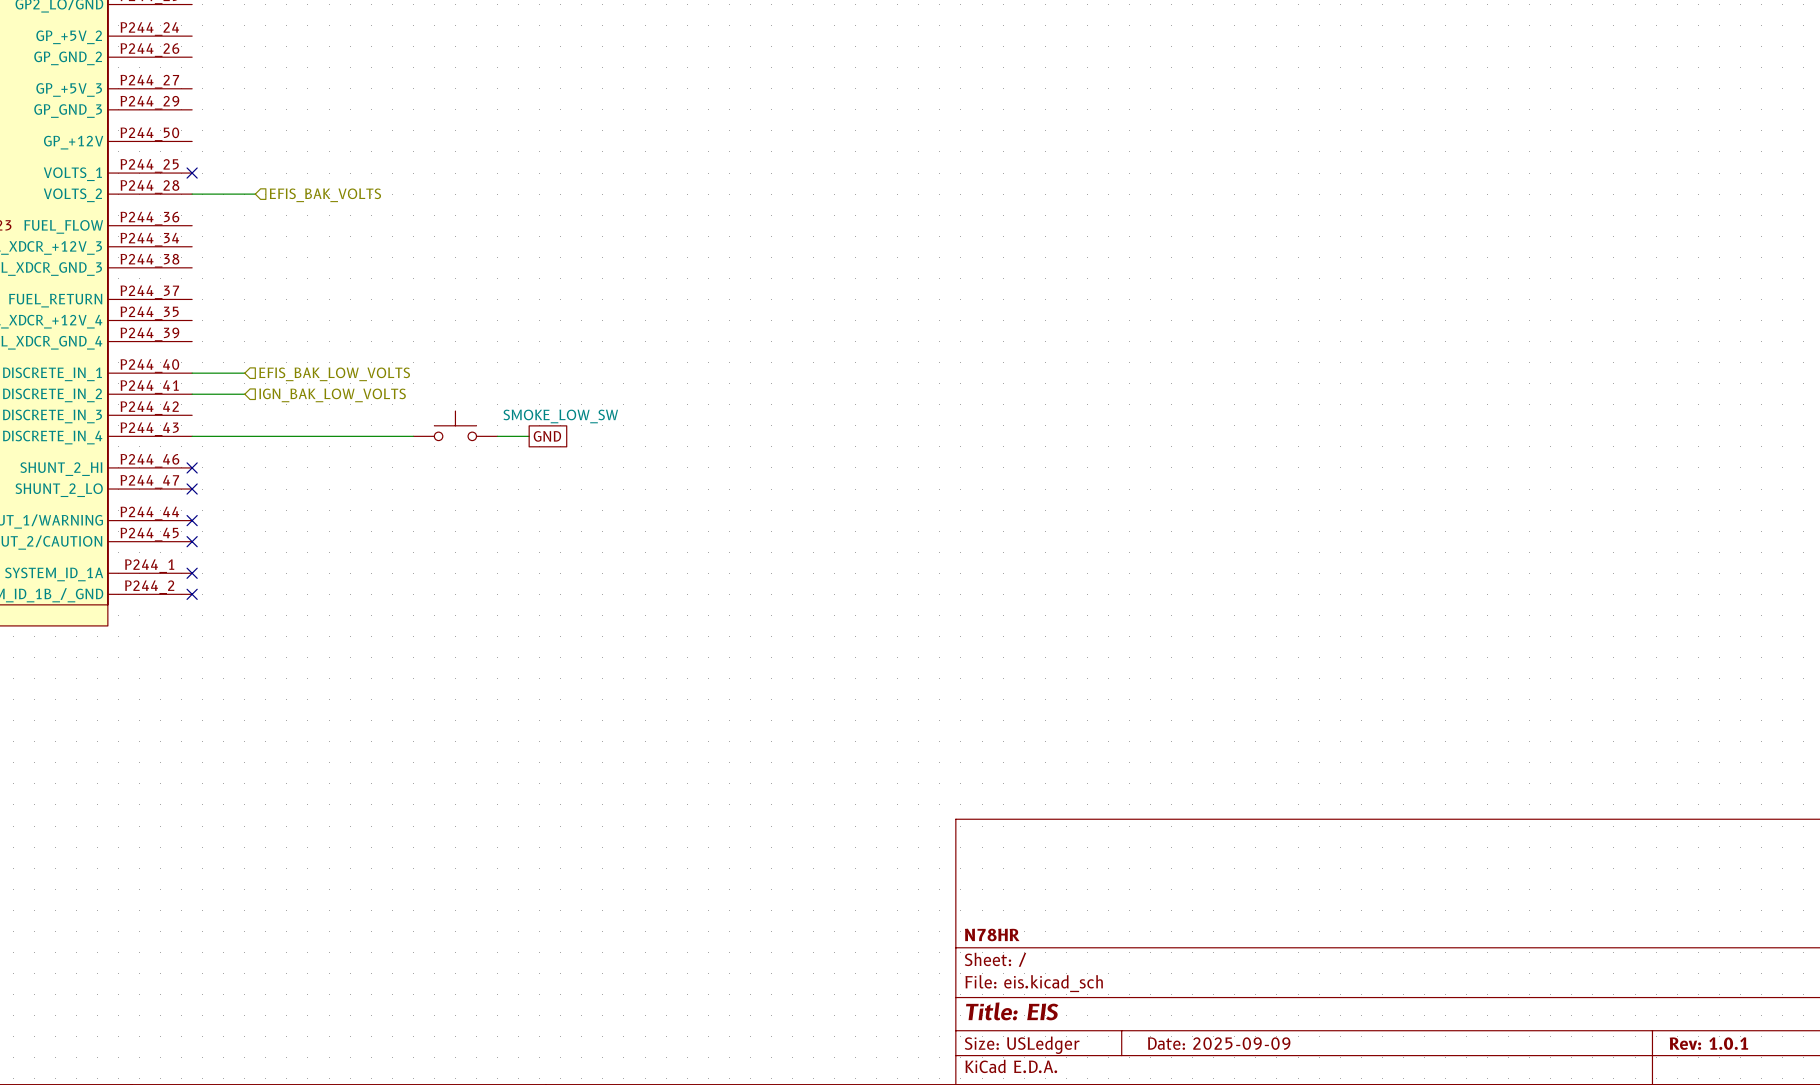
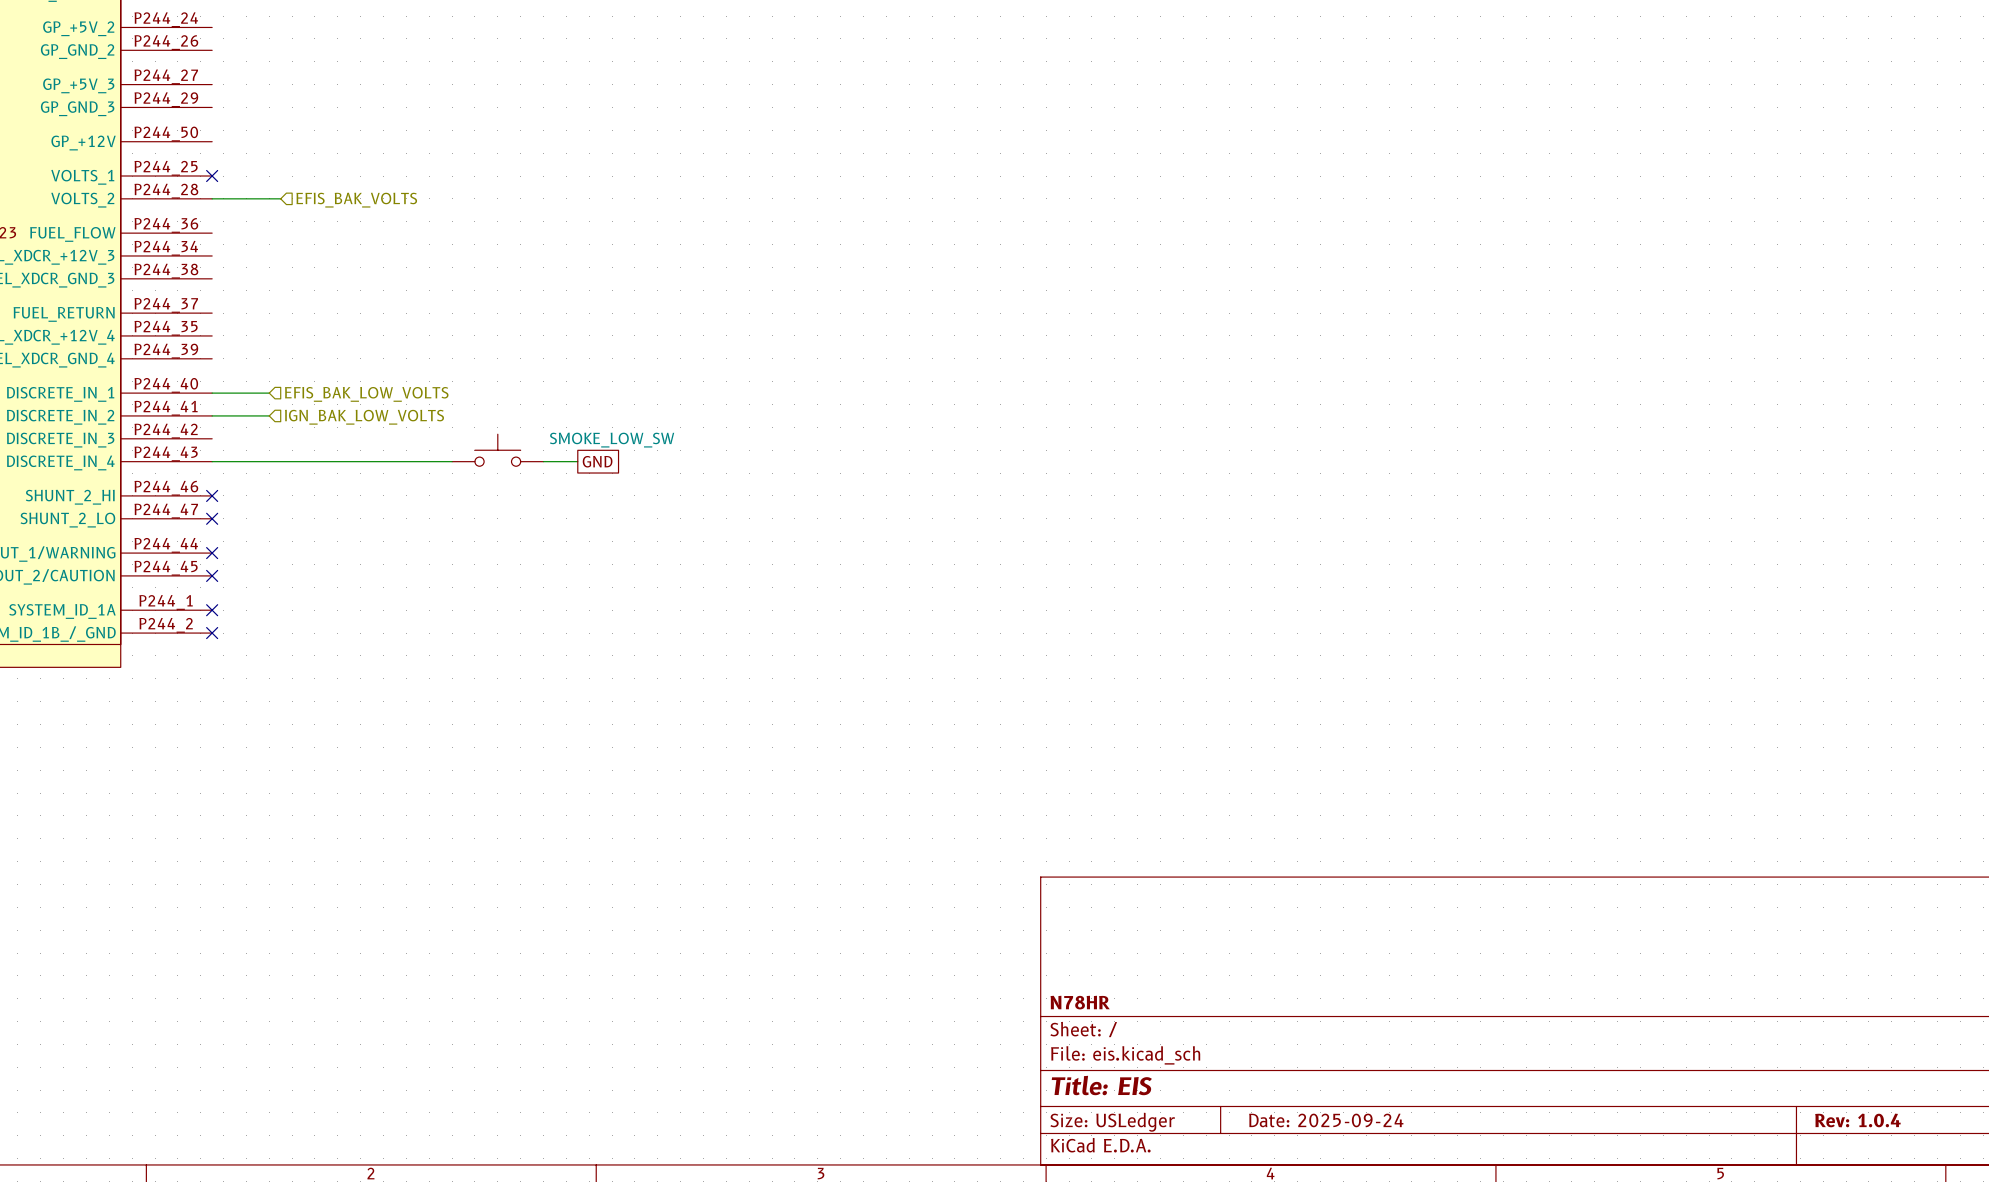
title block: Date: 2025-09-09 (1219, 1043) -> Date: 2025-09-24 (1326, 1120)
title block: Rev: 1.0.1 (1708, 1043) -> Rev: 1.0.4 (1857, 1120)

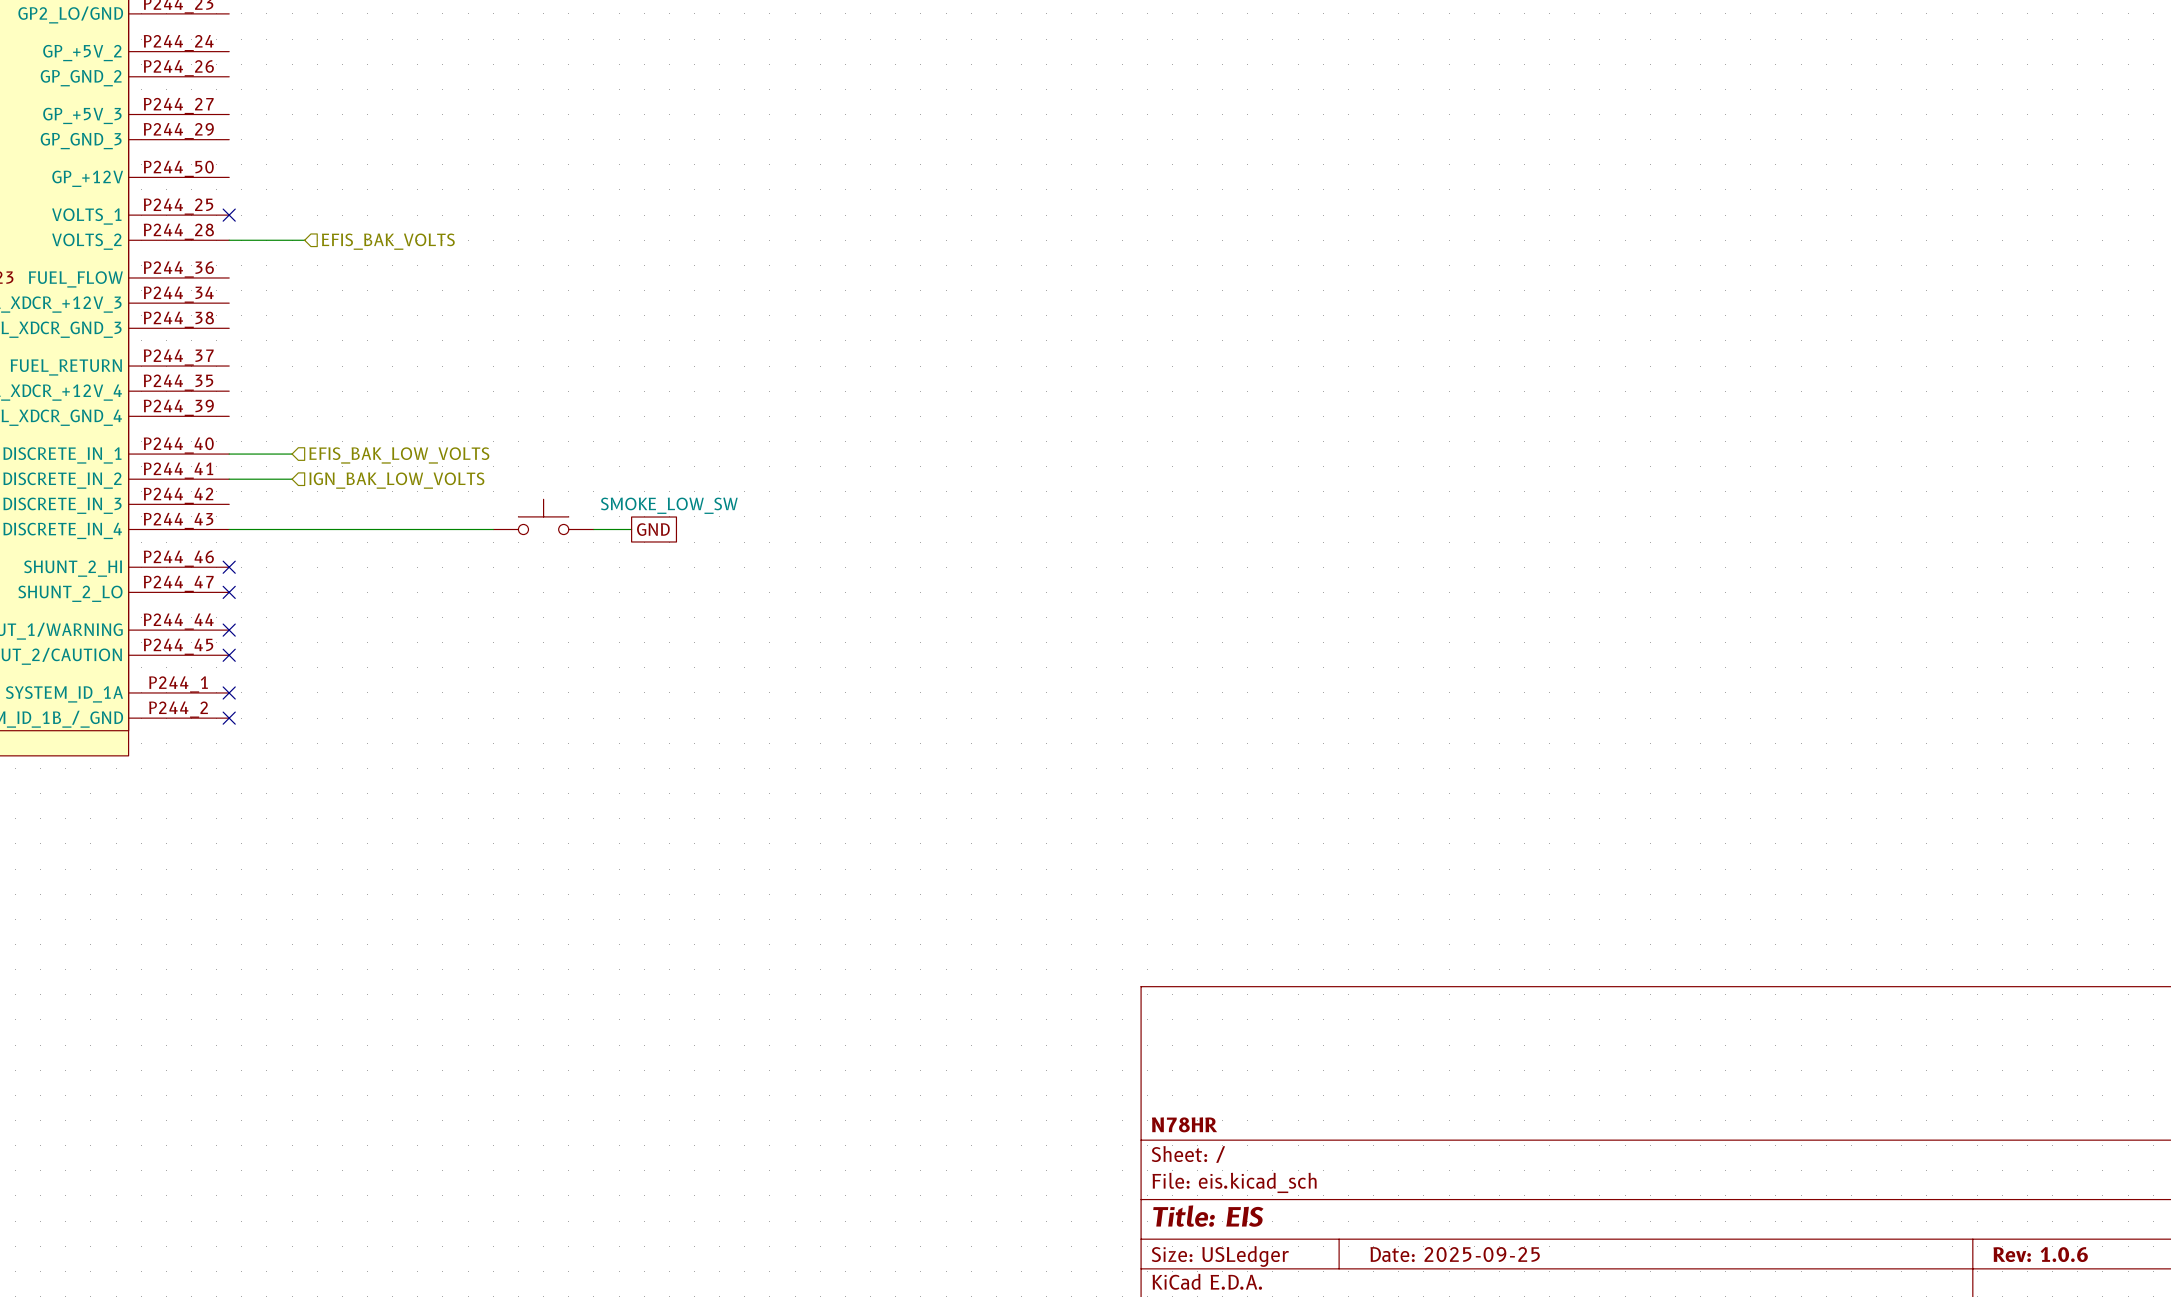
title block: Date: 2025-09-24 (1326, 1120) -> Date: 2025-09-25 (1455, 1254)
title block: Rev: 1.0.4 (1857, 1120) -> Rev: 1.0.6 (2040, 1254)

